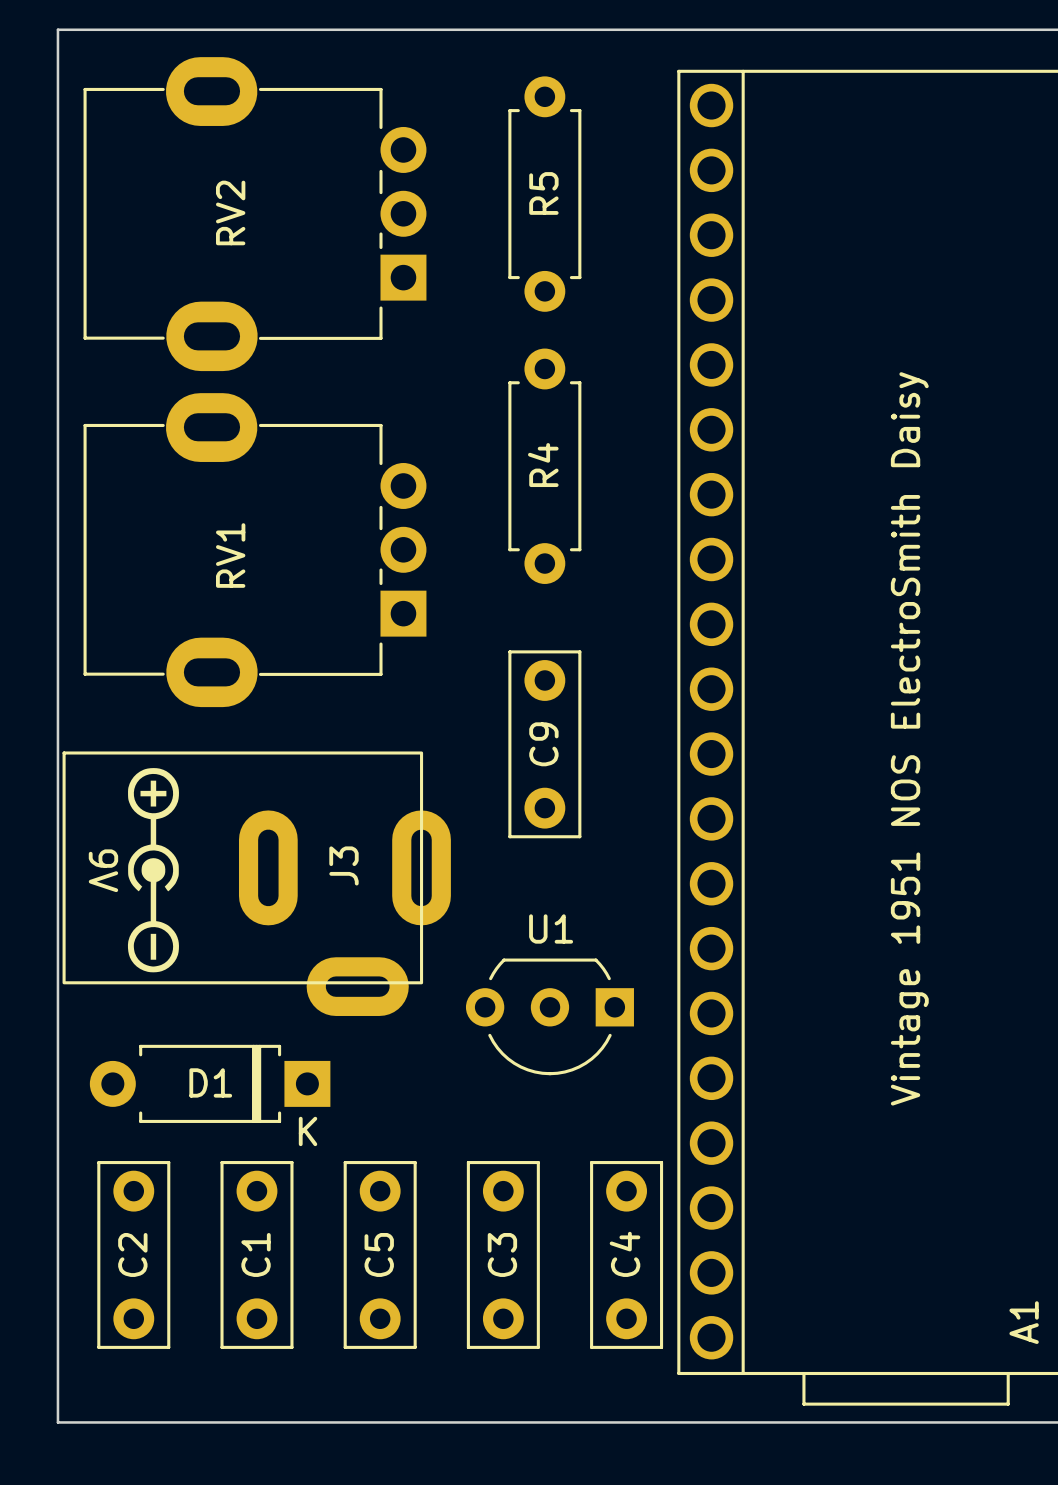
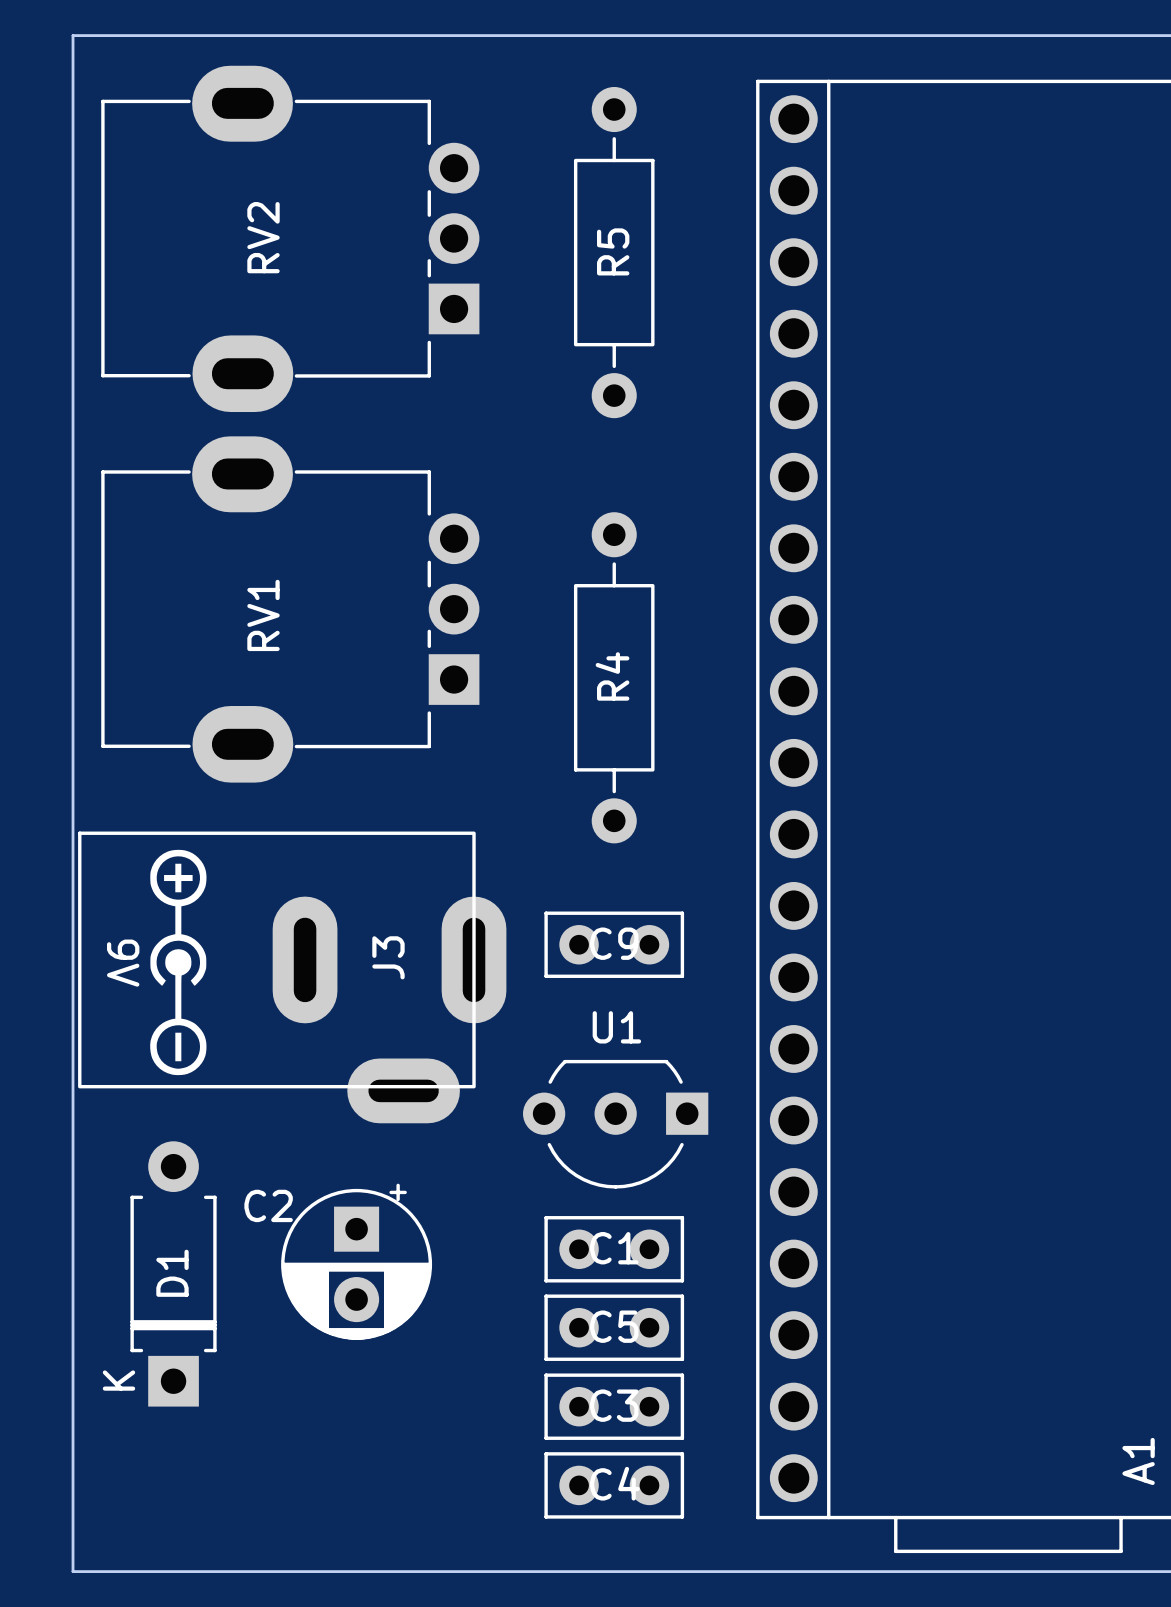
R5 footprint: [508, 76, 582, 312] -> [573, 86, 655, 419]
R4 footprint: [508, 348, 582, 584] -> [573, 512, 655, 844]
C9 footprint: [508, 650, 582, 839] -> [544, 911, 685, 978]
text: Vintage 1951 NOS ElectroSmith Daisy (909, 738) -> none
D1 rotation: 0° (210, 1083) -> 90° clockwise (173, 1273)
C2 footprint: [97, 1161, 171, 1349] -> [281, 1183, 433, 1340]
C1 footprint: [220, 1161, 294, 1349] -> [544, 1216, 685, 1283]
C5 footprint: [343, 1161, 417, 1349] -> [544, 1294, 685, 1361]
C3 footprint: [466, 1161, 540, 1349] -> [544, 1373, 685, 1440]
C4 footprint: [590, 1161, 664, 1349] -> [544, 1452, 685, 1519]
C2 name position: C2 (132, 1254) -> C2 (268, 1205)

